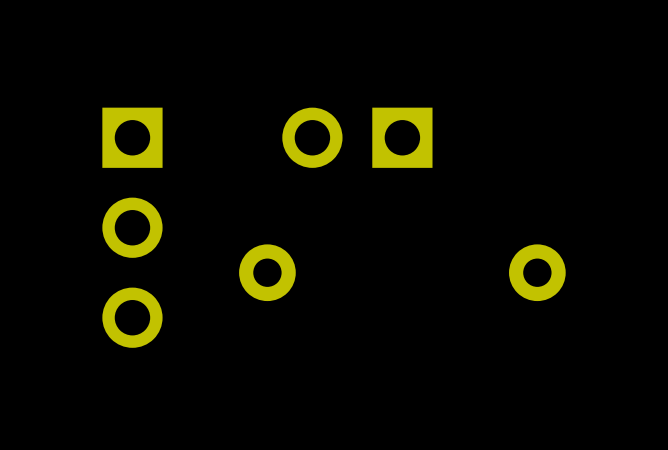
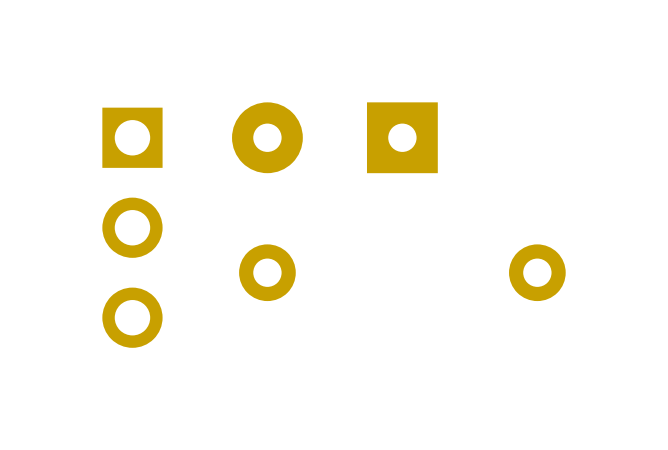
part footprint: [282, 107, 433, 168] -> [232, 102, 438, 174]

